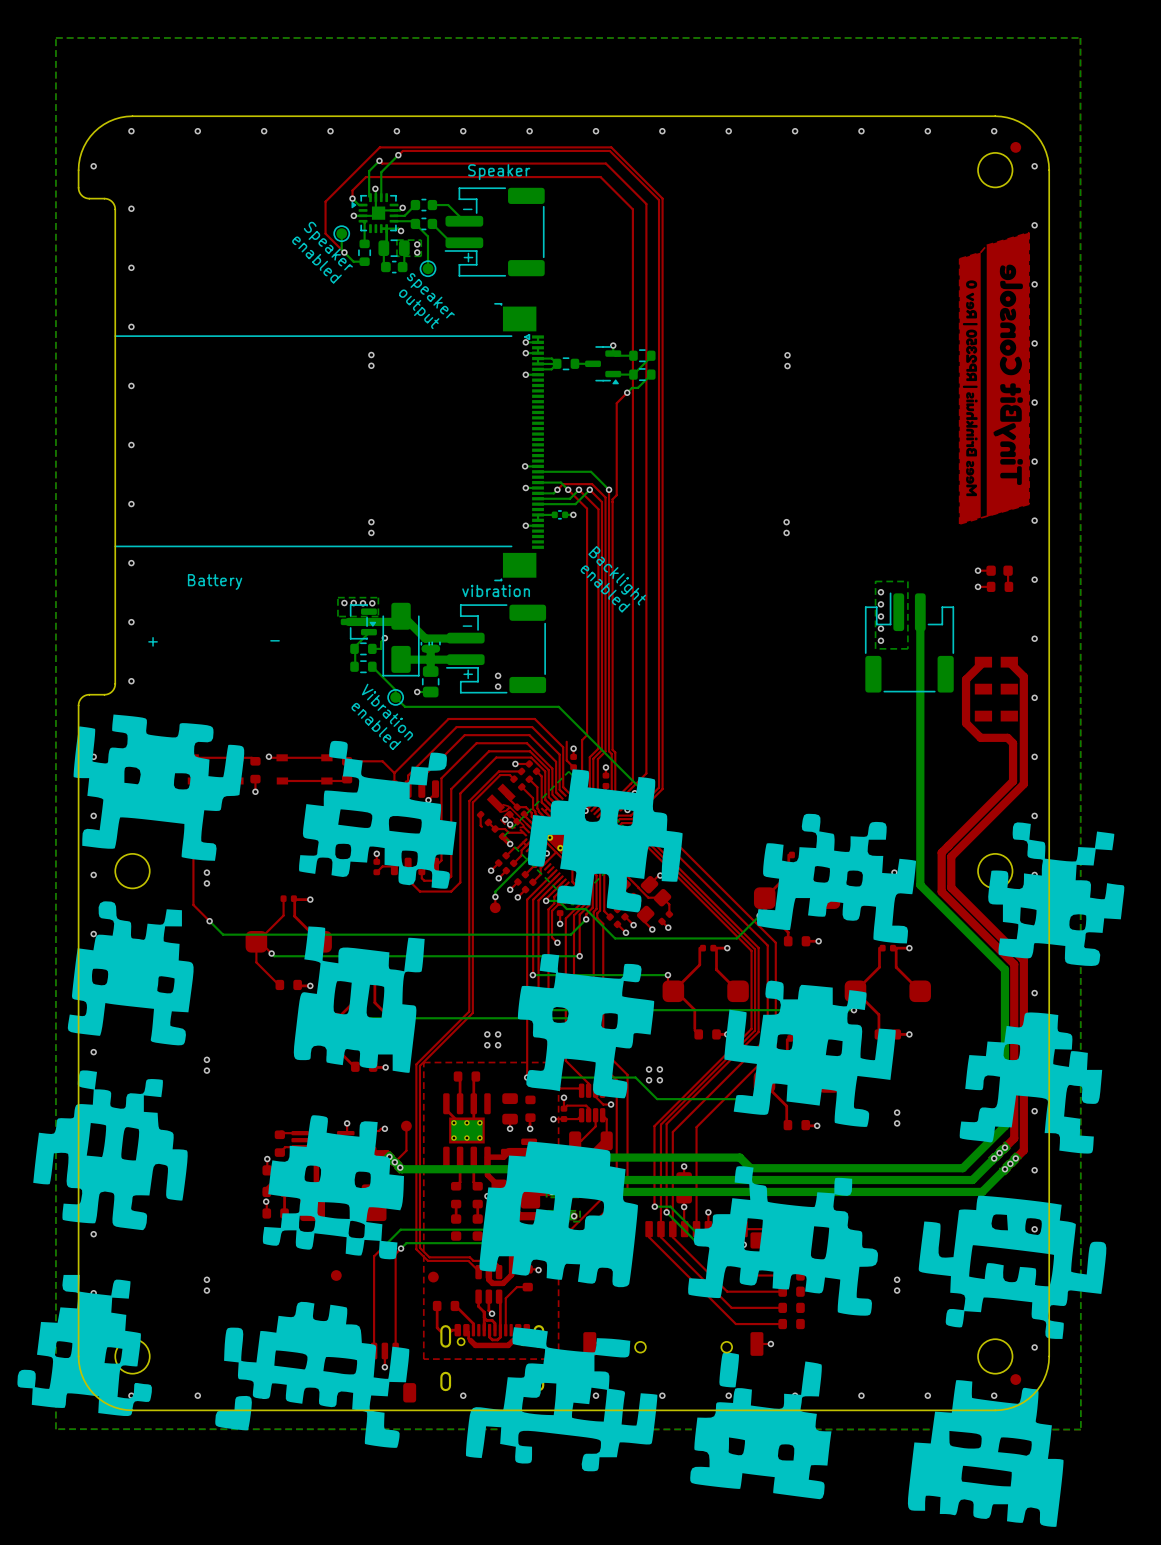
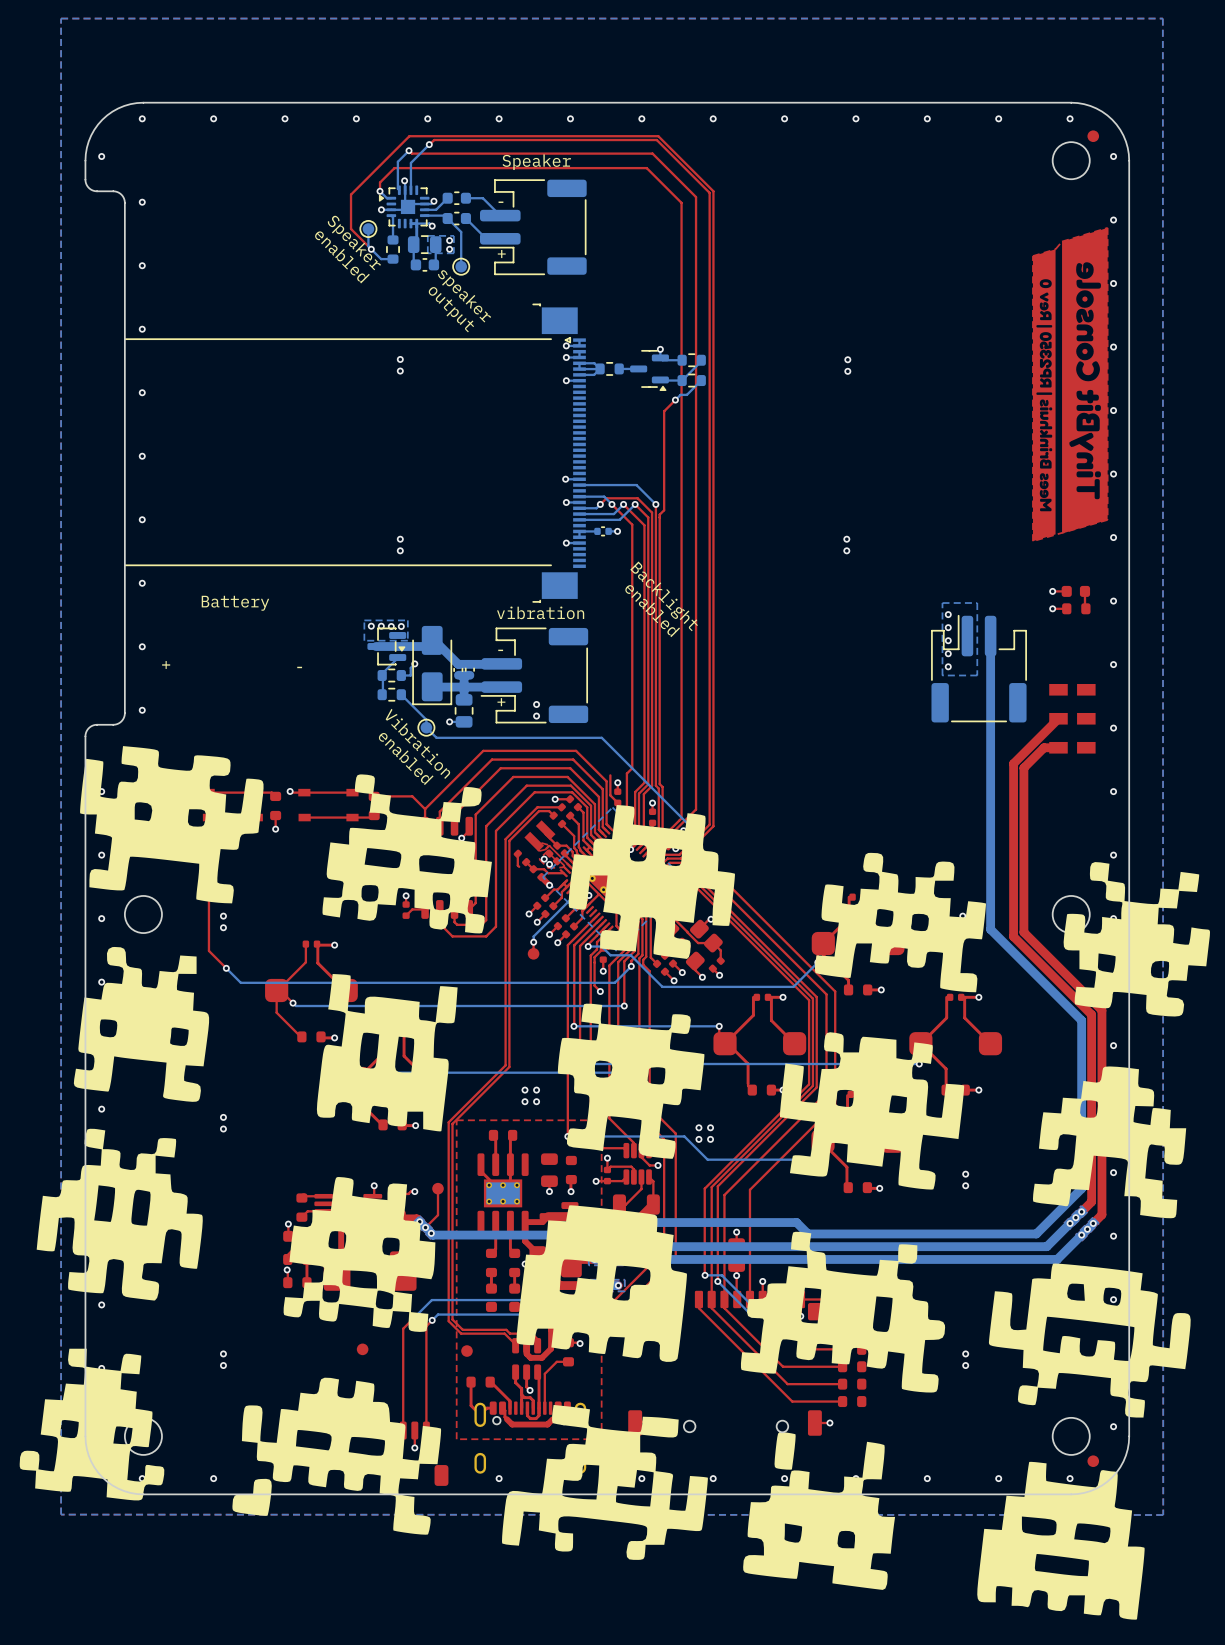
top track: (983, 662) (966, 679) (966, 723) (980, 737) (1007, 737) (1013, 743) (1013, 781) (941, 852) -> (1058, 718) (1013, 763) (1013, 894)
top track: (1009, 662) (1023, 676) (1023, 784) (951, 856) -> (1058, 747) (1044, 747) (1023, 767) (1023, 898)

